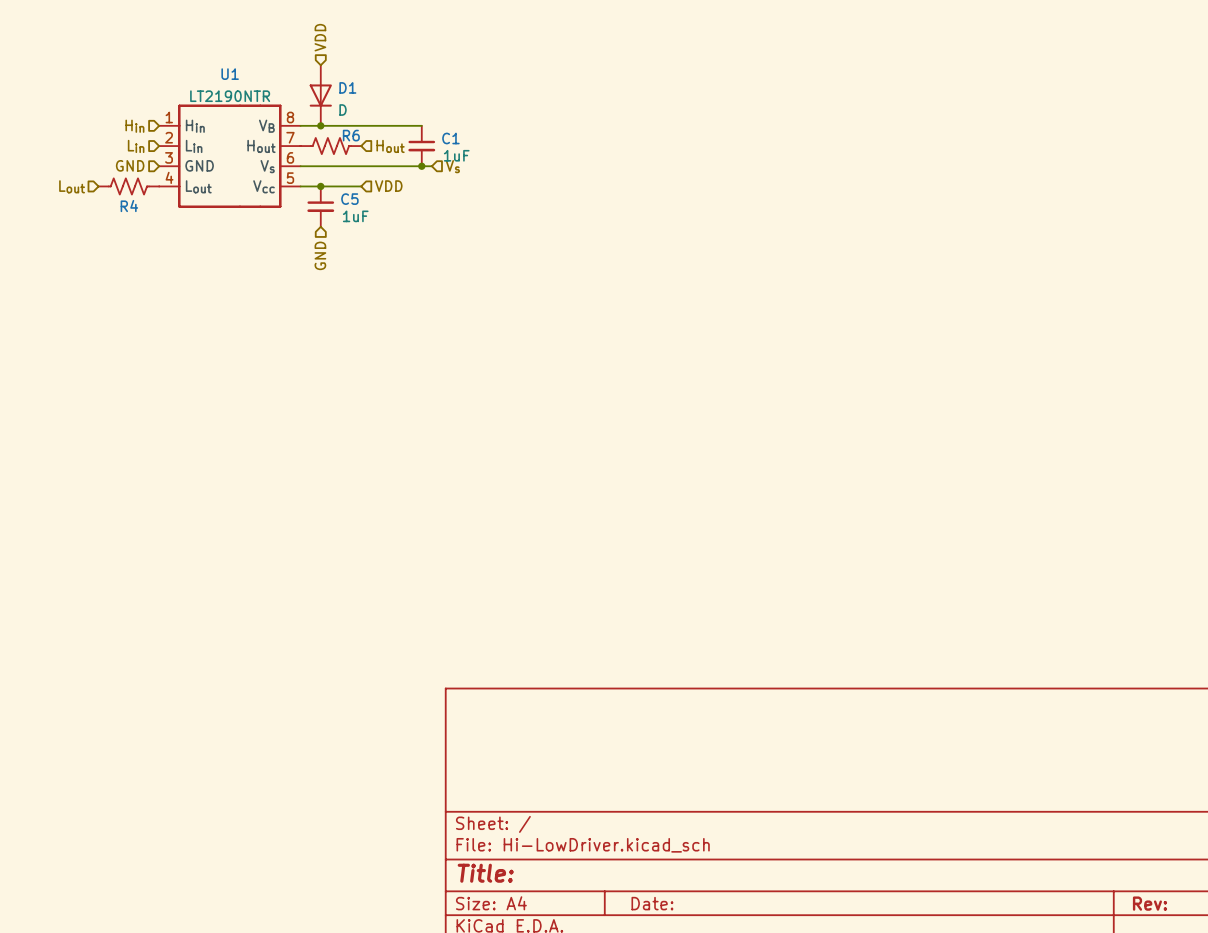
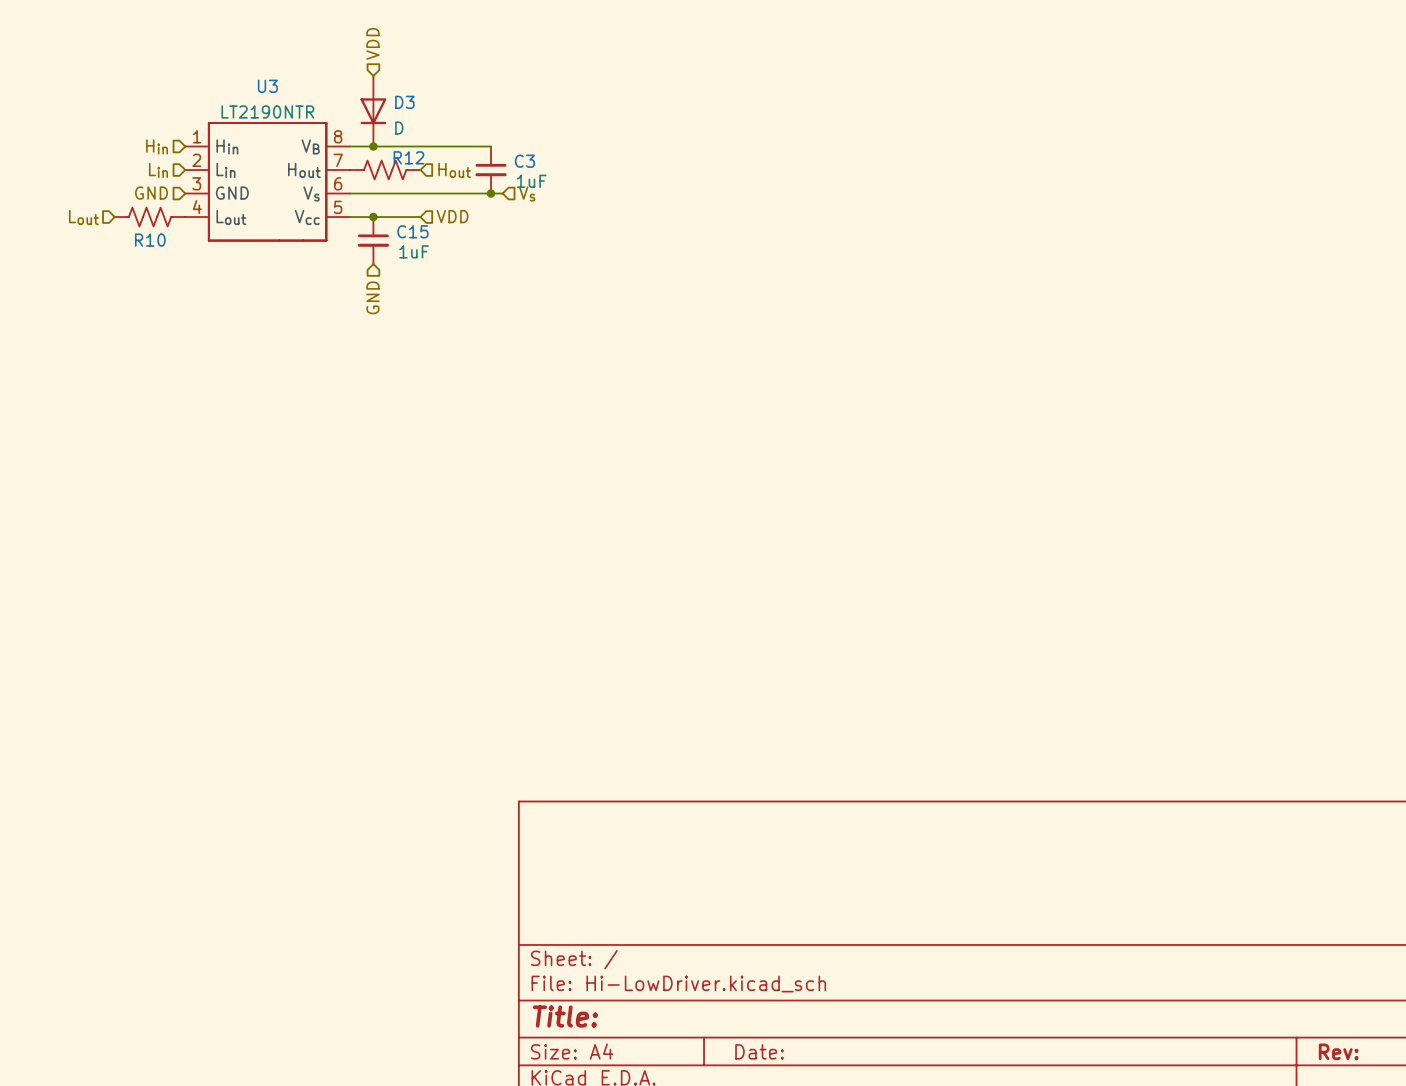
U1 name: U1 (230, 74) -> U3 (267, 86)
D1 name: D1 (347, 87) -> D3 (404, 102)
R6 name: R6 (351, 135) -> R12 (408, 157)
C1 name: C1 (450, 138) -> C3 (524, 161)
C5 name: C5 (349, 199) -> C15 (412, 231)
R4 name: R4 (129, 206) -> R10 (150, 240)

